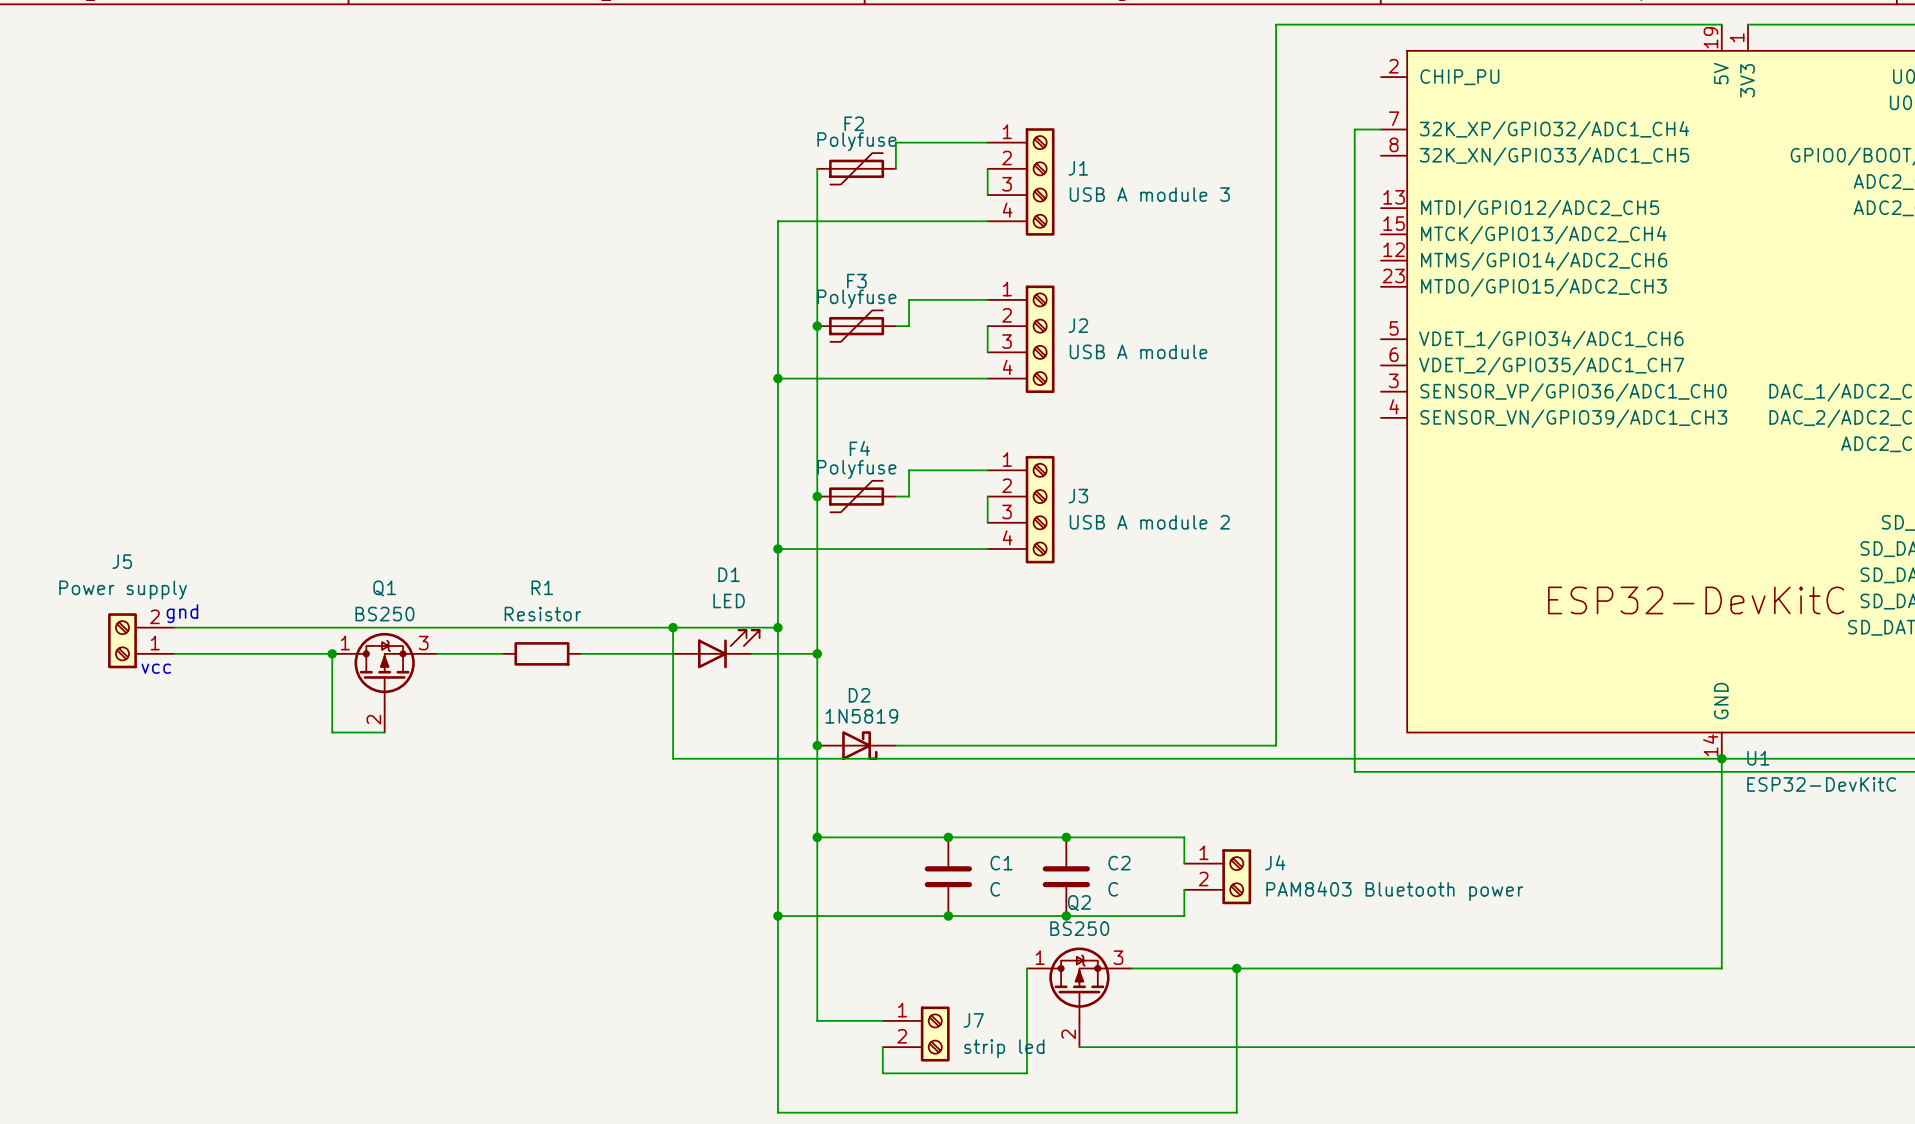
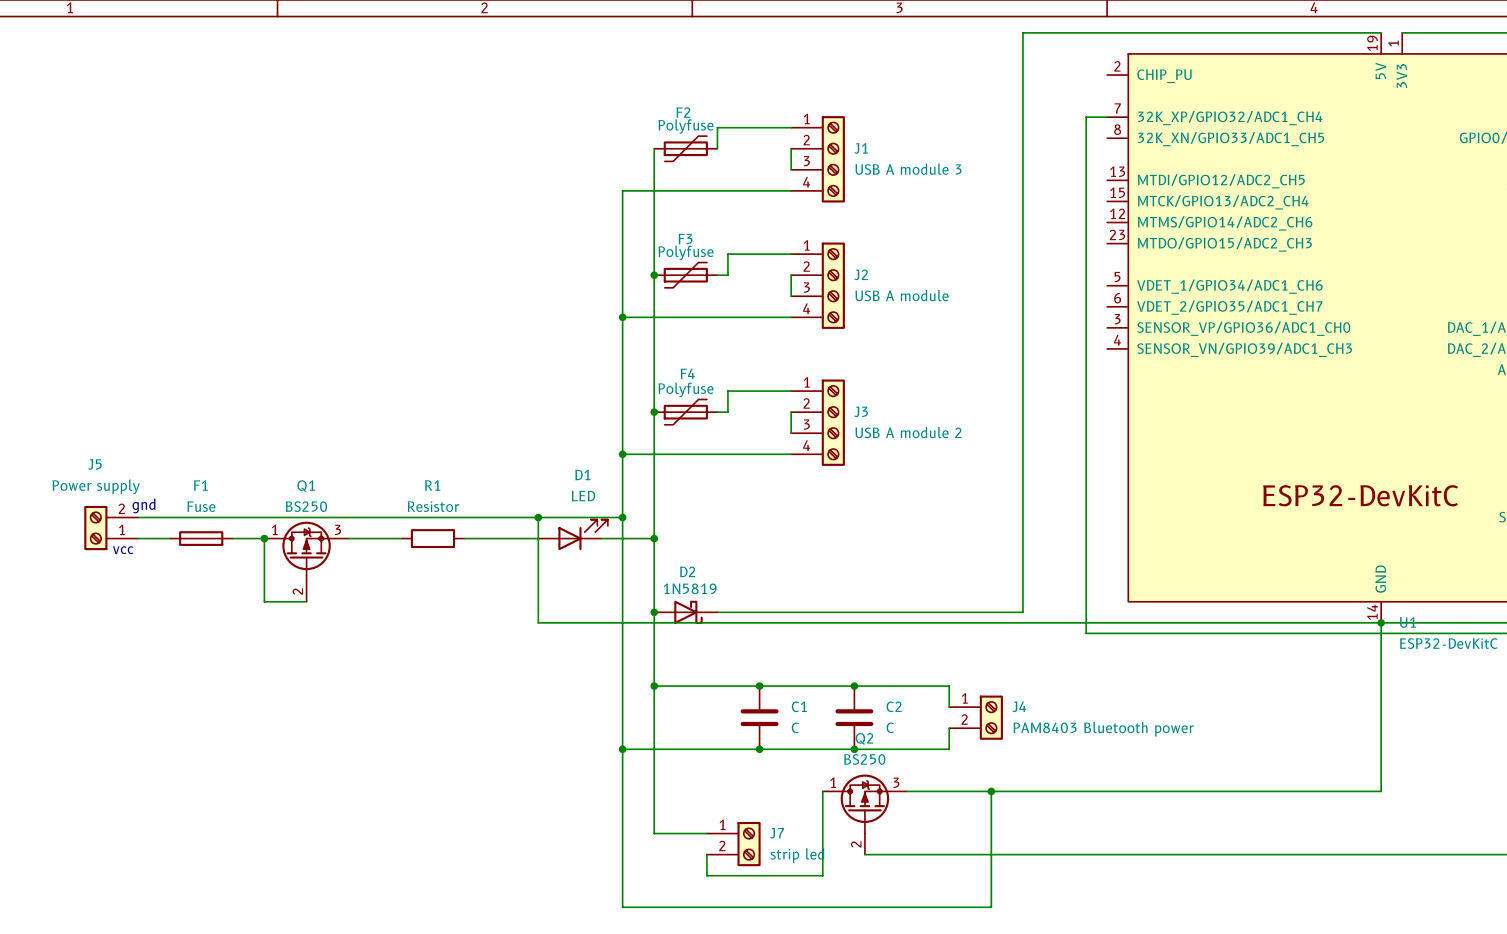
F1: none -> Fuse (201, 538)

